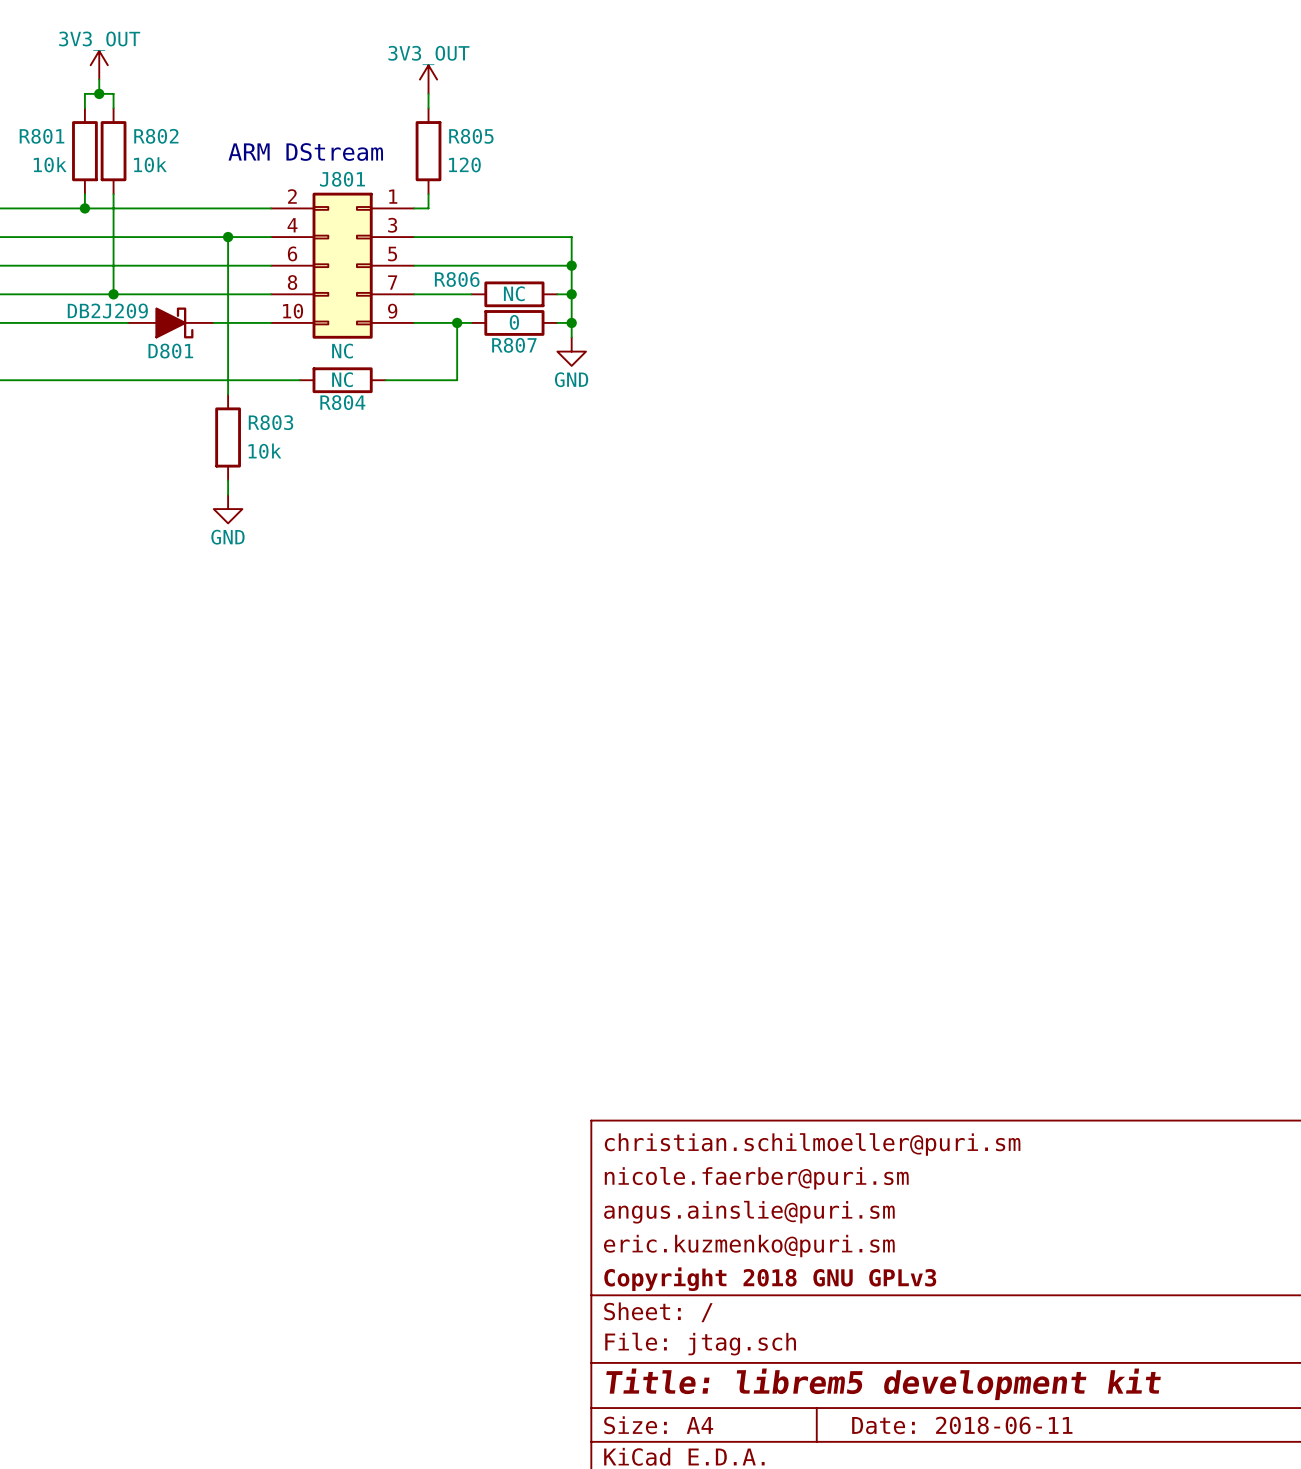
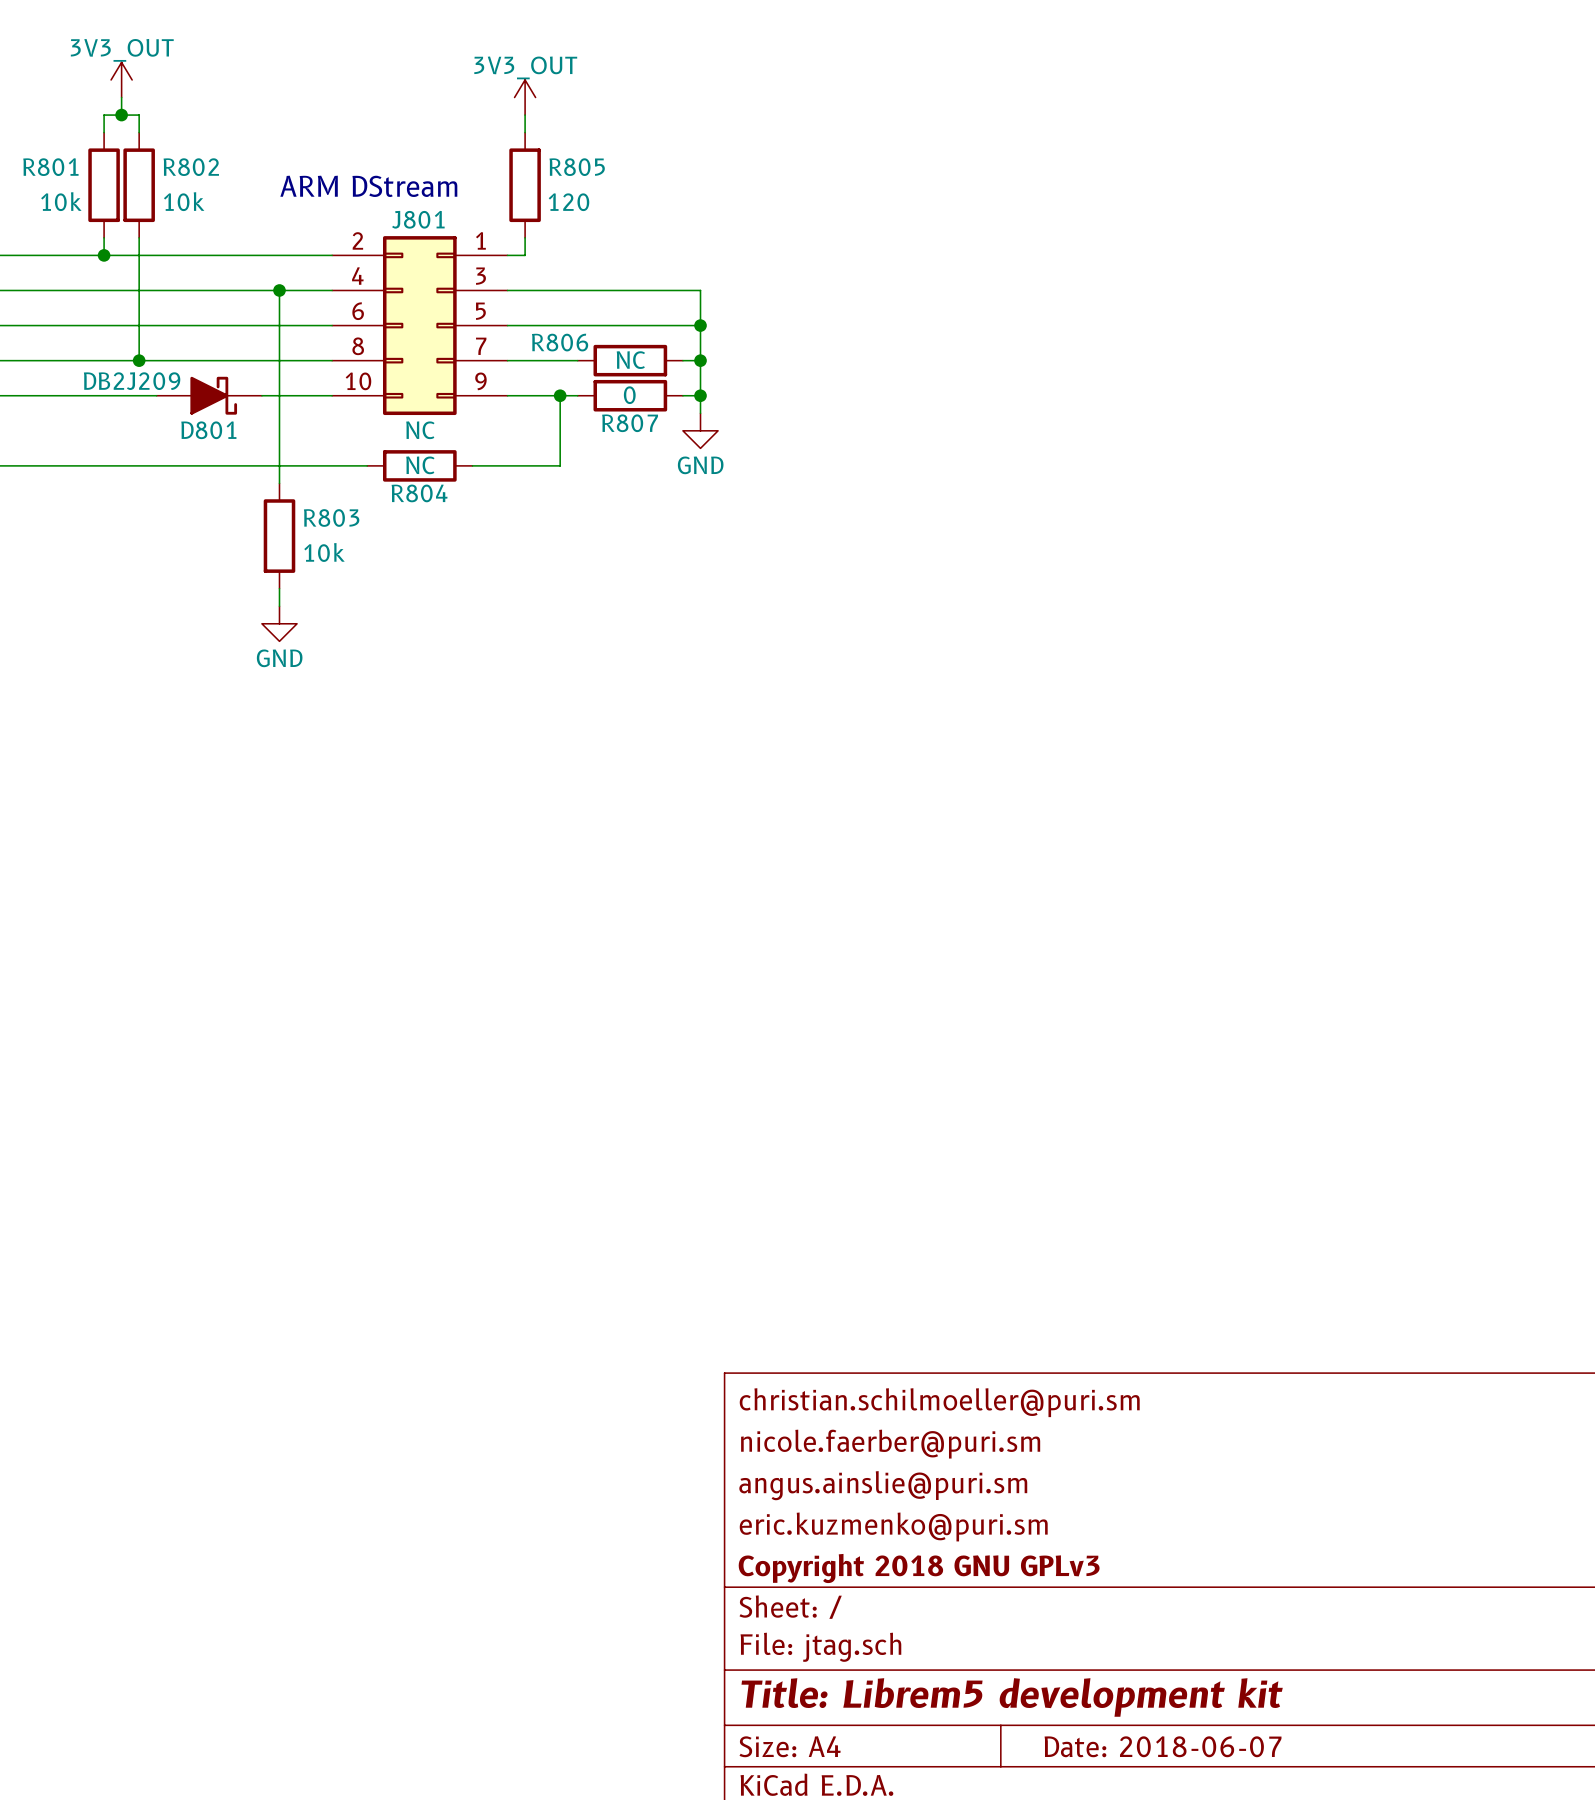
title block: Title: librem5 development kit (883, 1384) -> Title: Librem5 development kit (1012, 1697)
title block: Date: 2018-06-11 (962, 1425) -> Date: 2018-06-07 (1163, 1746)

